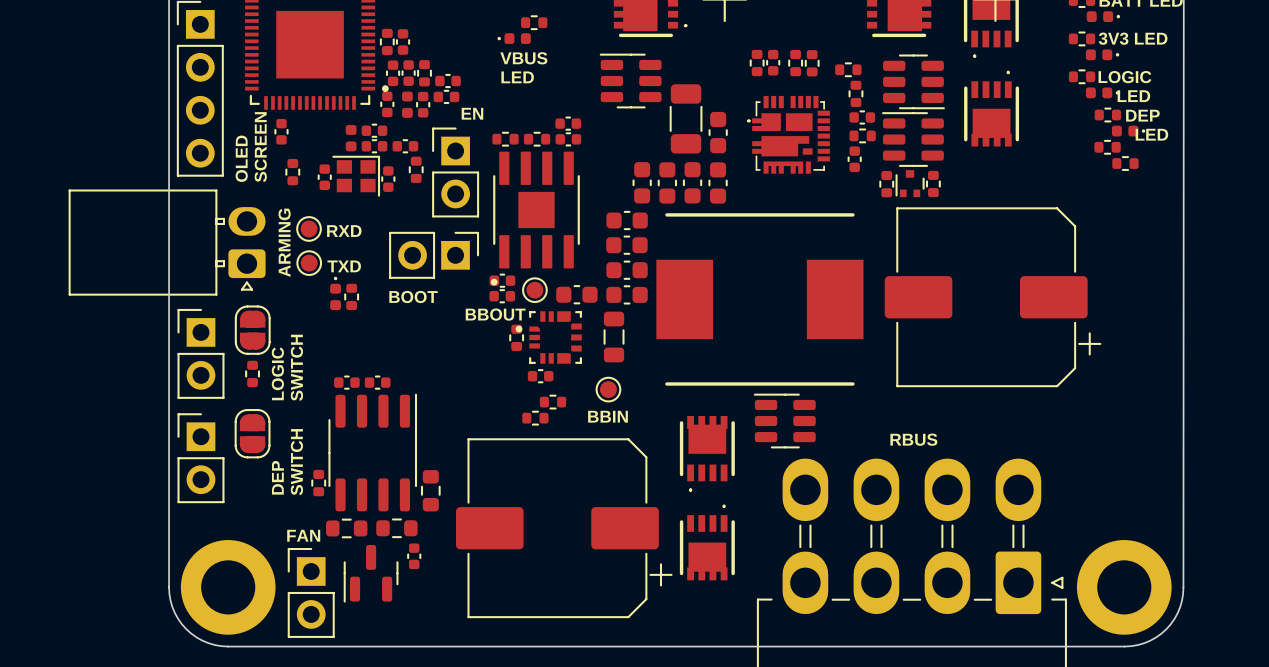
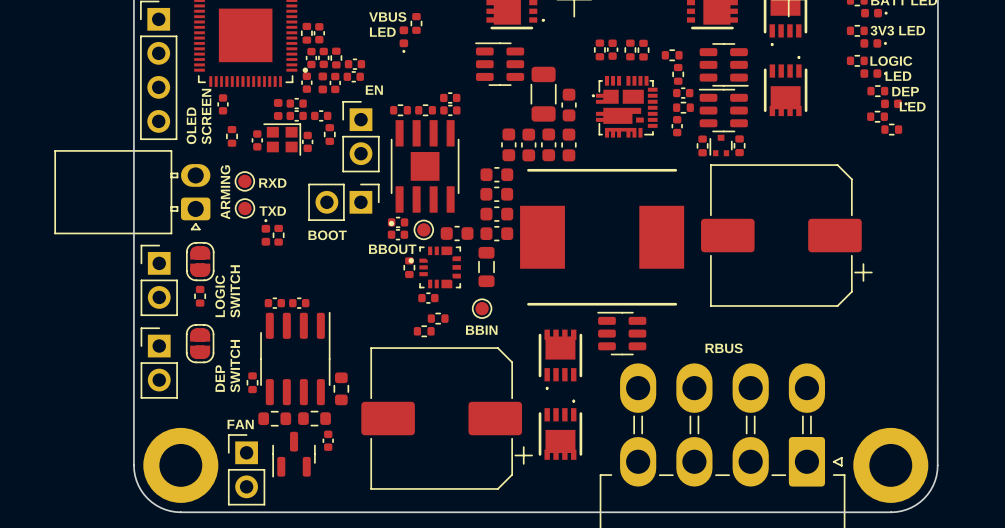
part rotation: 0° (534, 22) -> 90° clockwise (416, 23)
part rotation: 0° (514, 38) -> 90° counterclockwise (403, 39)
text position: VBUS (523, 58) -> VBUS (387, 17)
text position: LED (517, 77) -> LED (382, 32)

